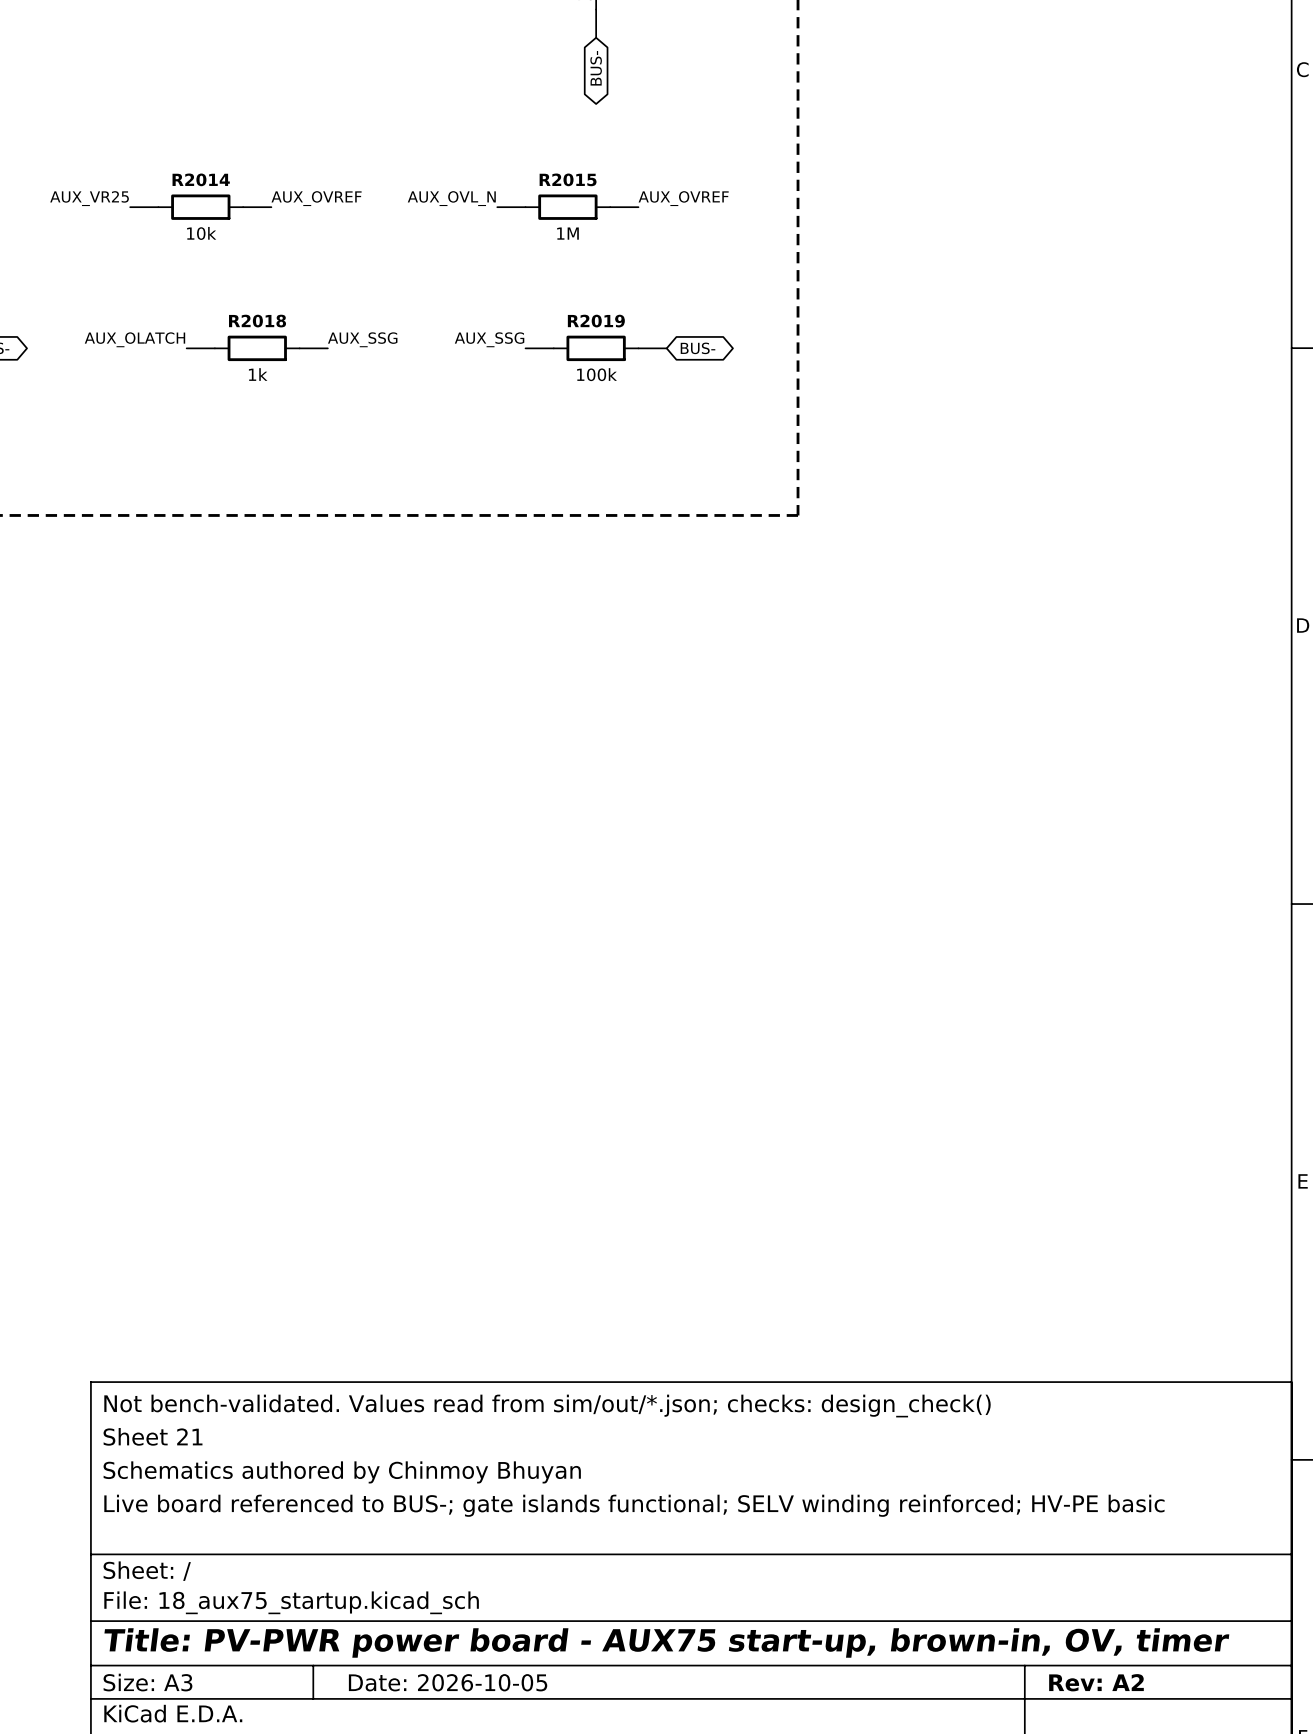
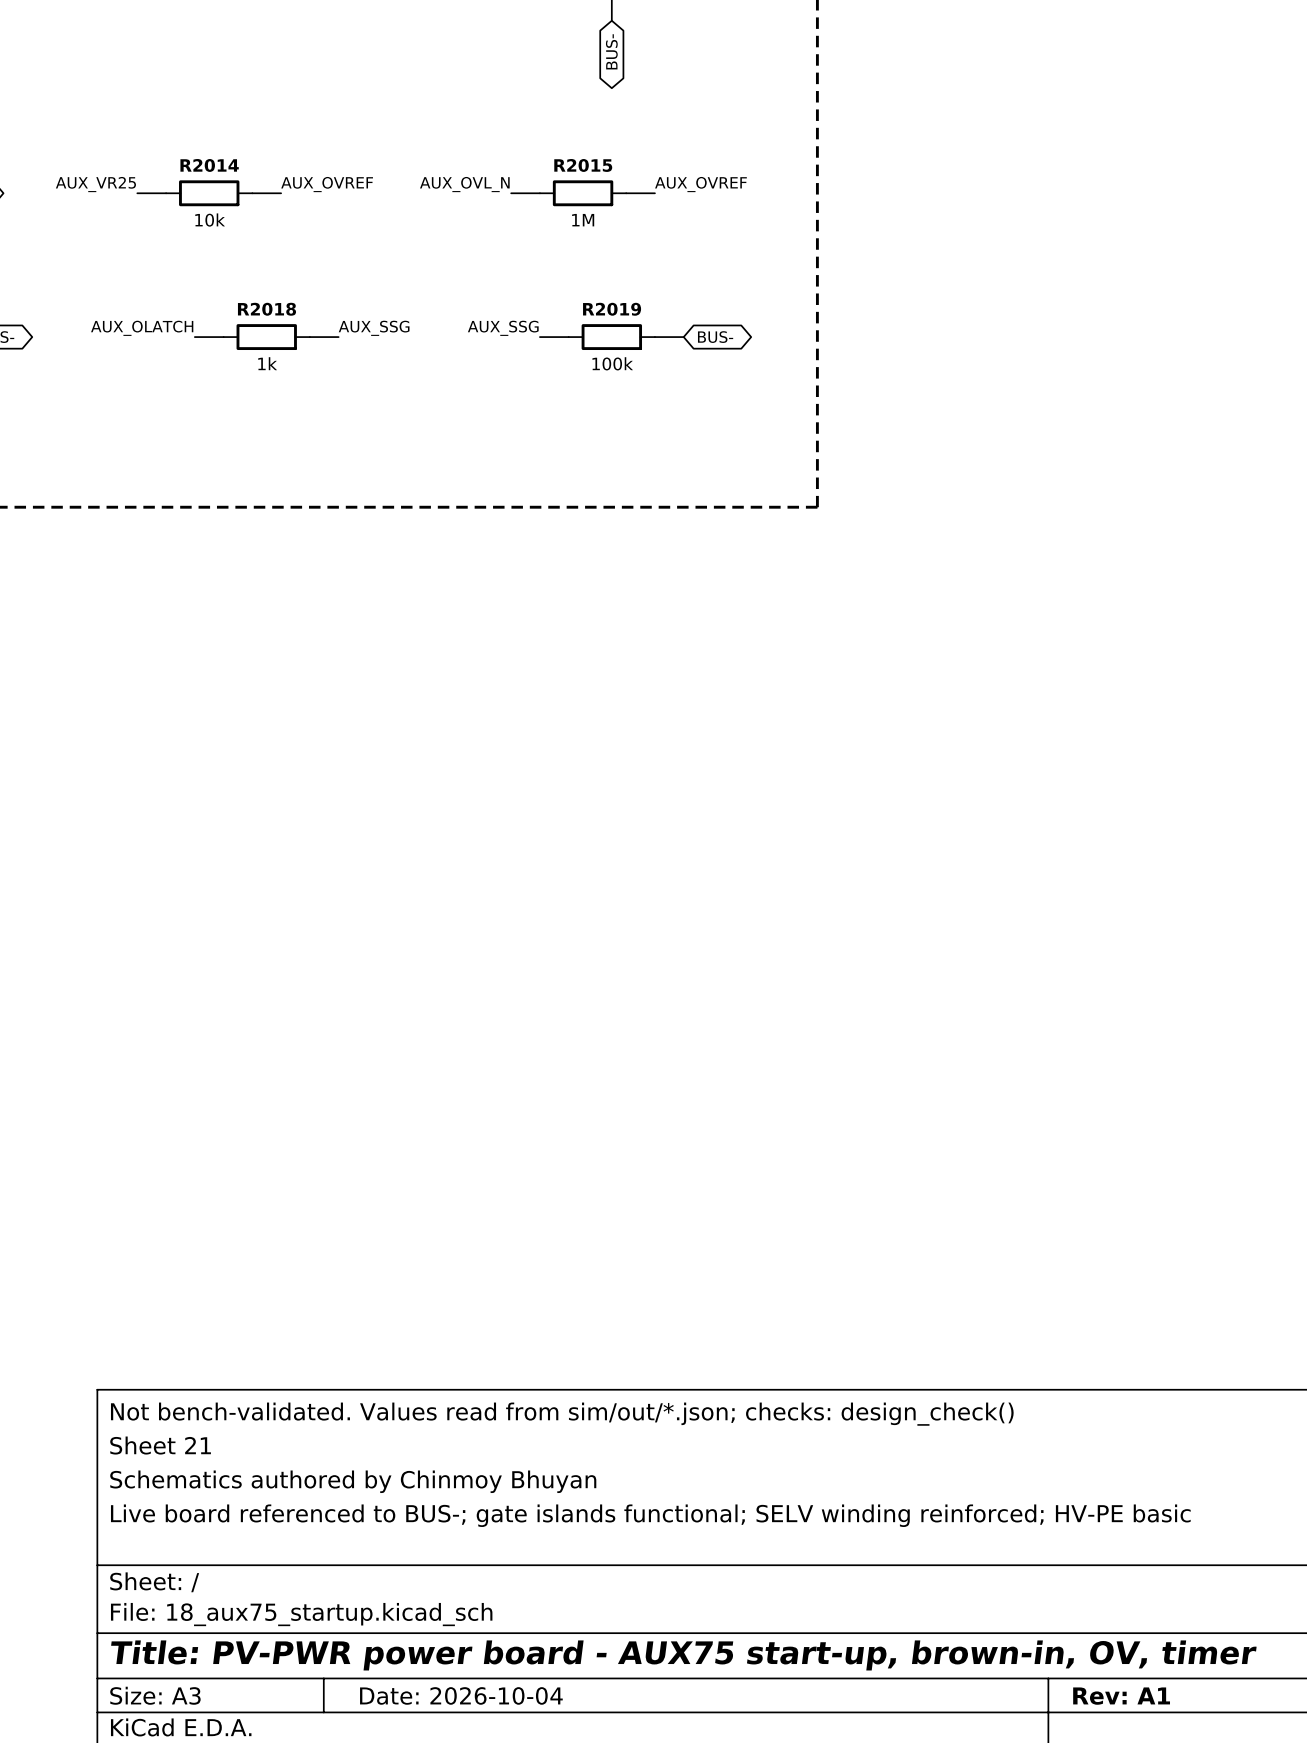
title block: Date: 2026-10-05 (448, 1682) -> Date: 2026-10-04 (461, 1695)
title block: Rev: A2 (1096, 1682) -> Rev: A1 (1121, 1696)

